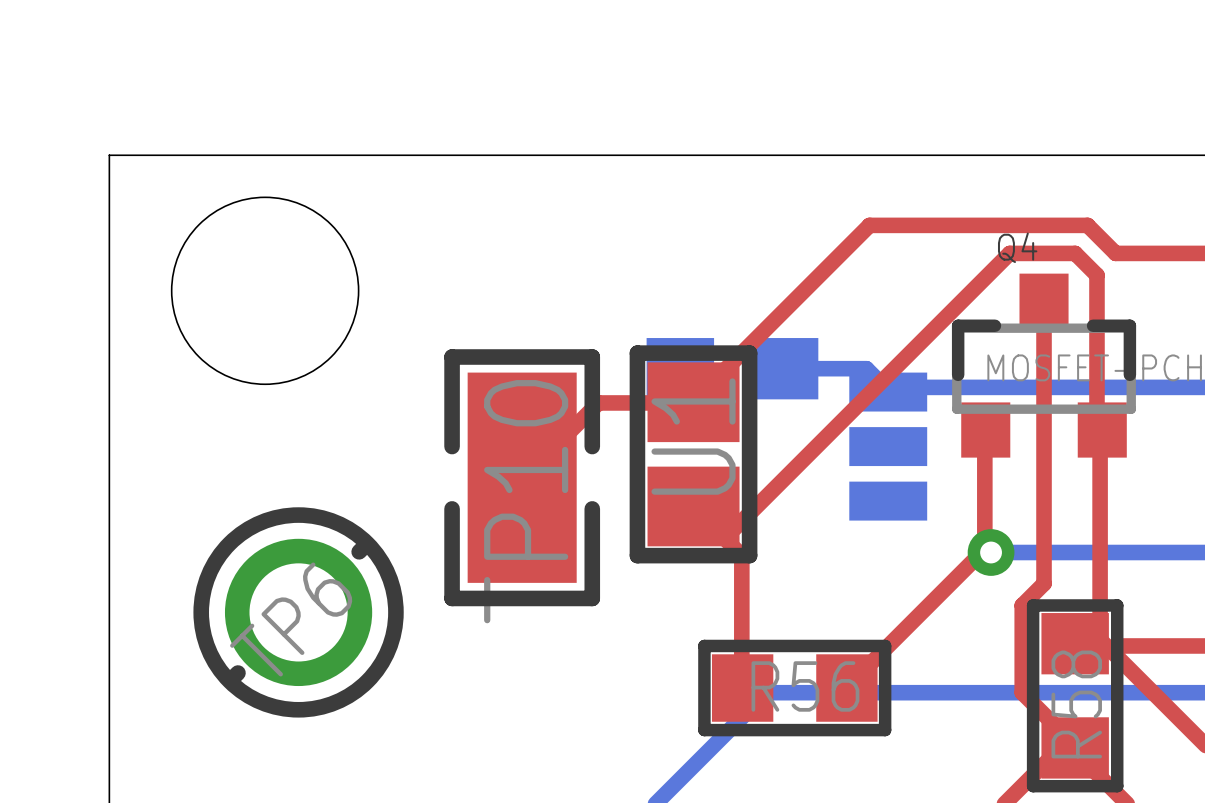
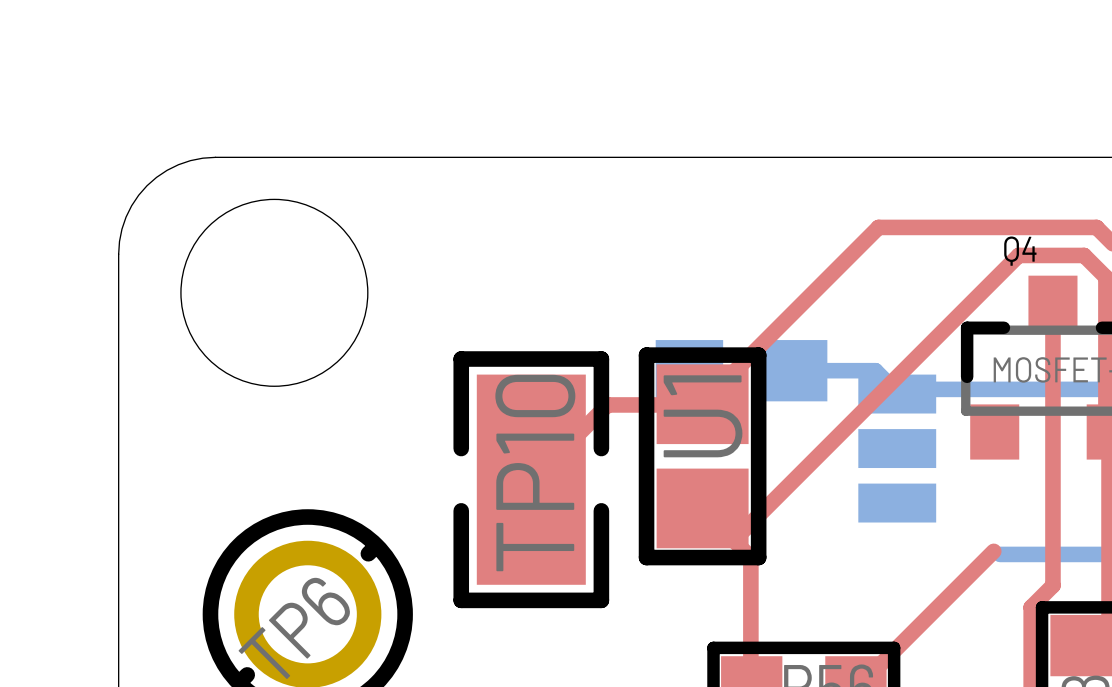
board edge: (206, 155) (109, 155) (109, 252) -> (215, 157) (190, 160) (178, 164) (167, 170) (147, 185) (131, 205) (126, 217) (121, 229) (118, 254)
top track: (985, 430) (984, 549) (991, 552) -> none
via: (991, 552) -> none

